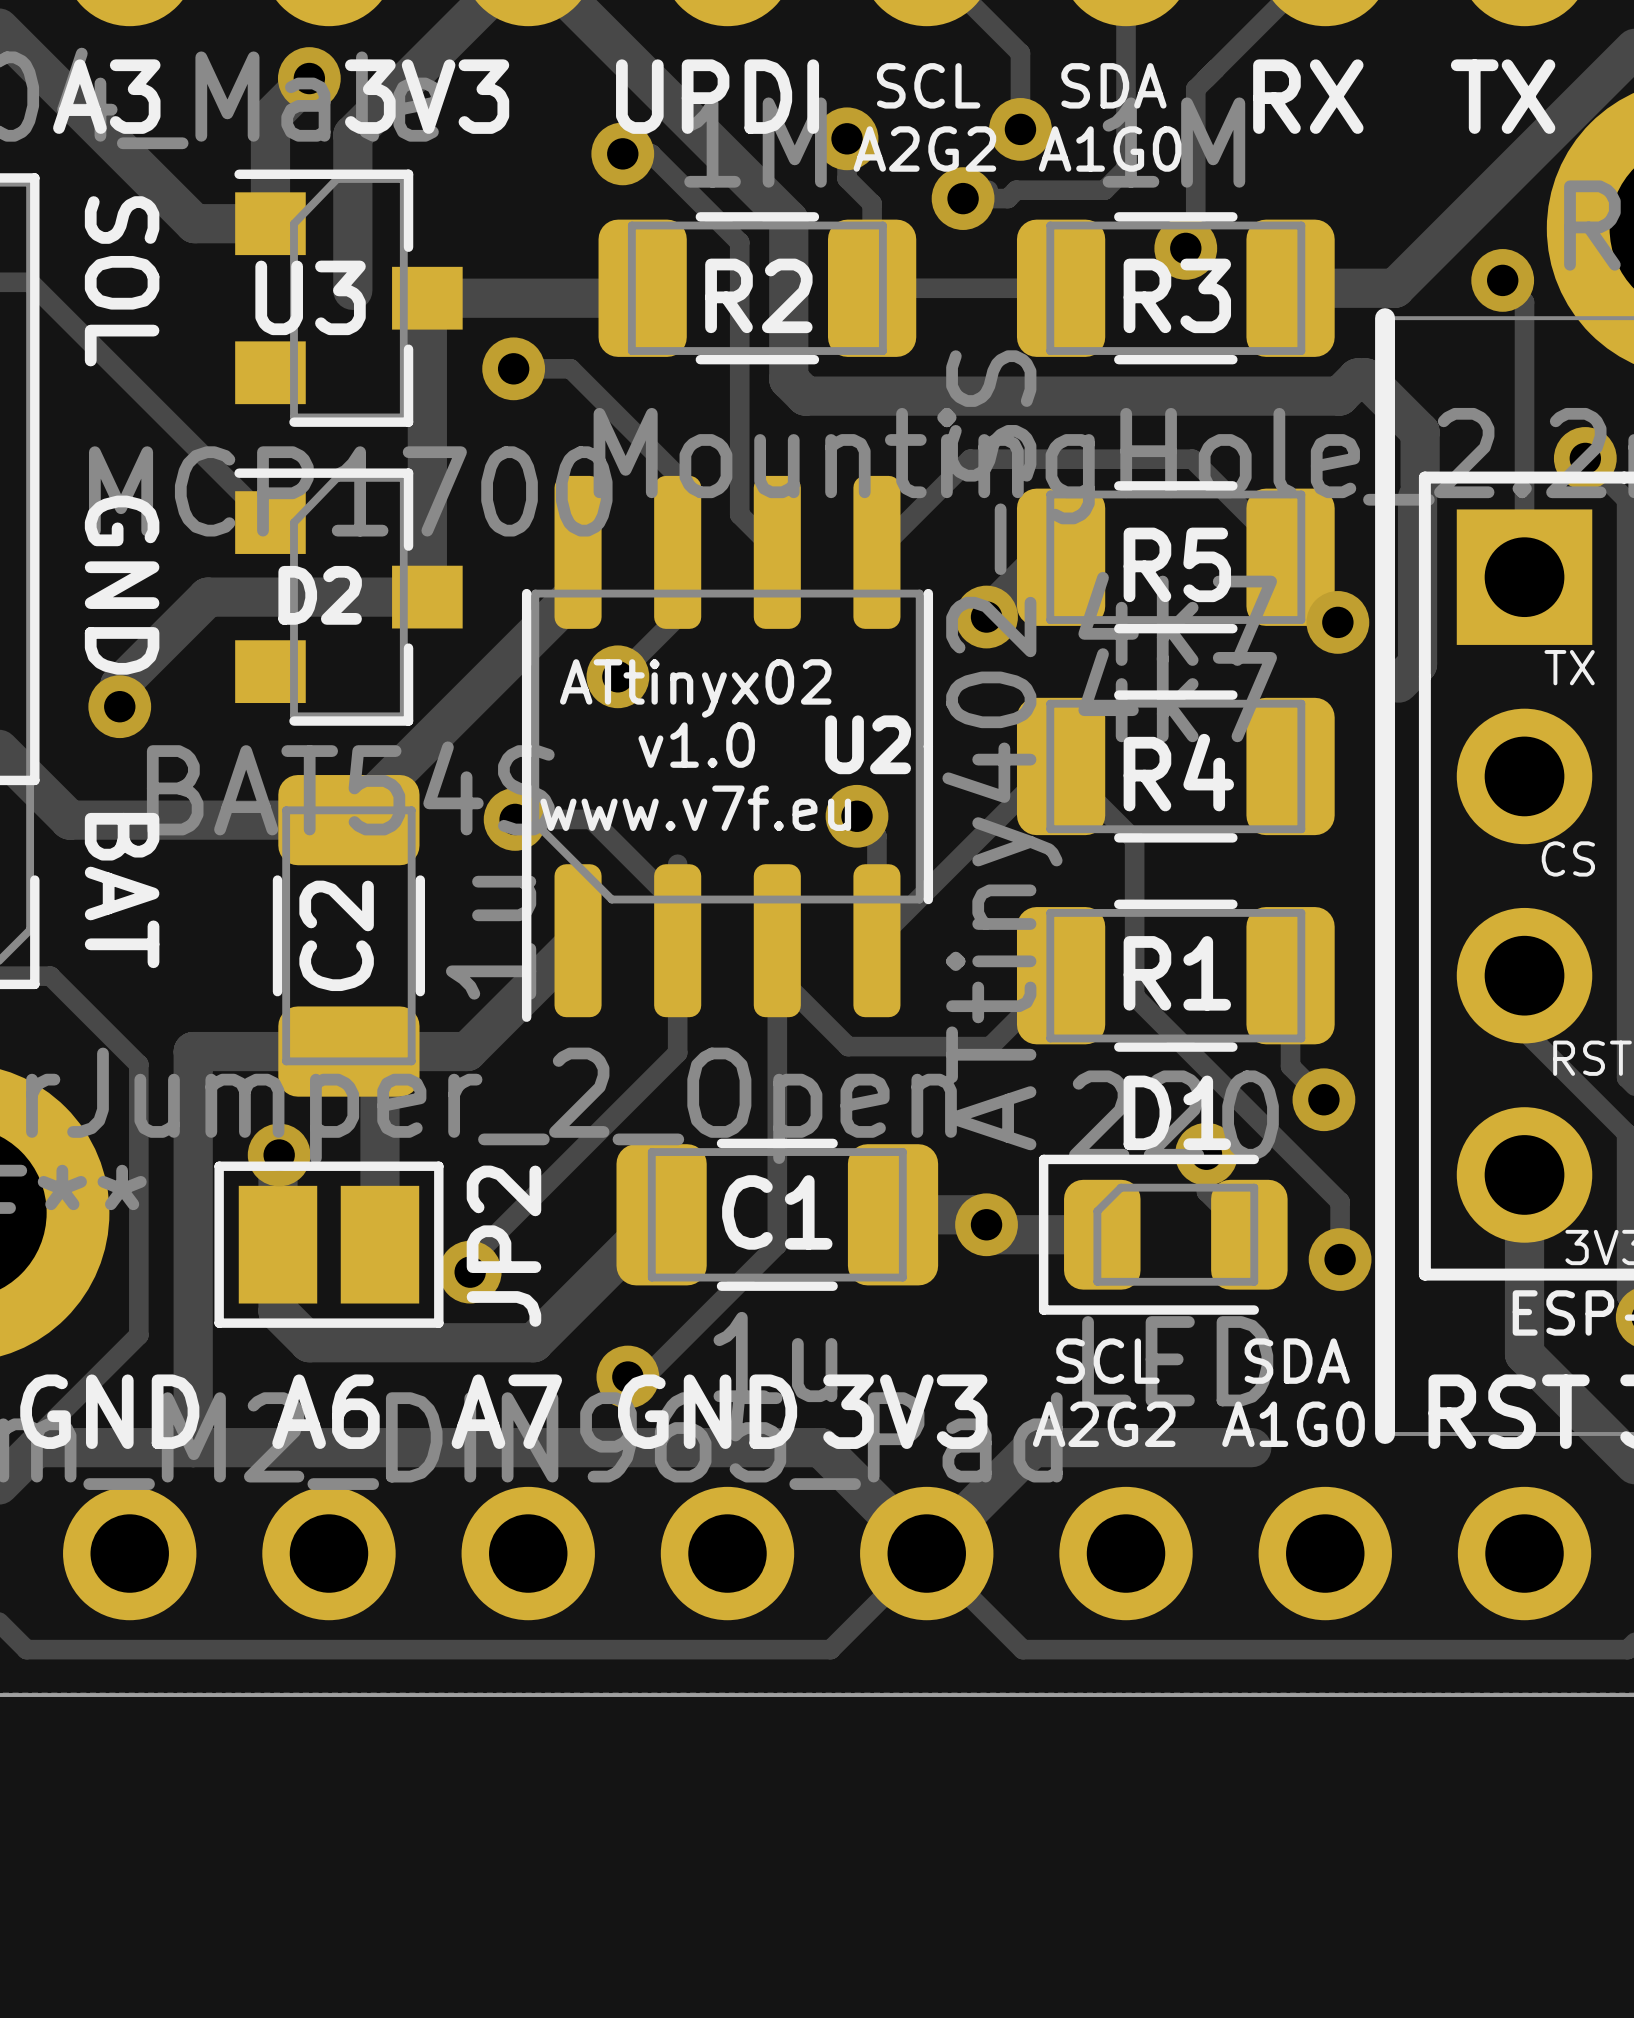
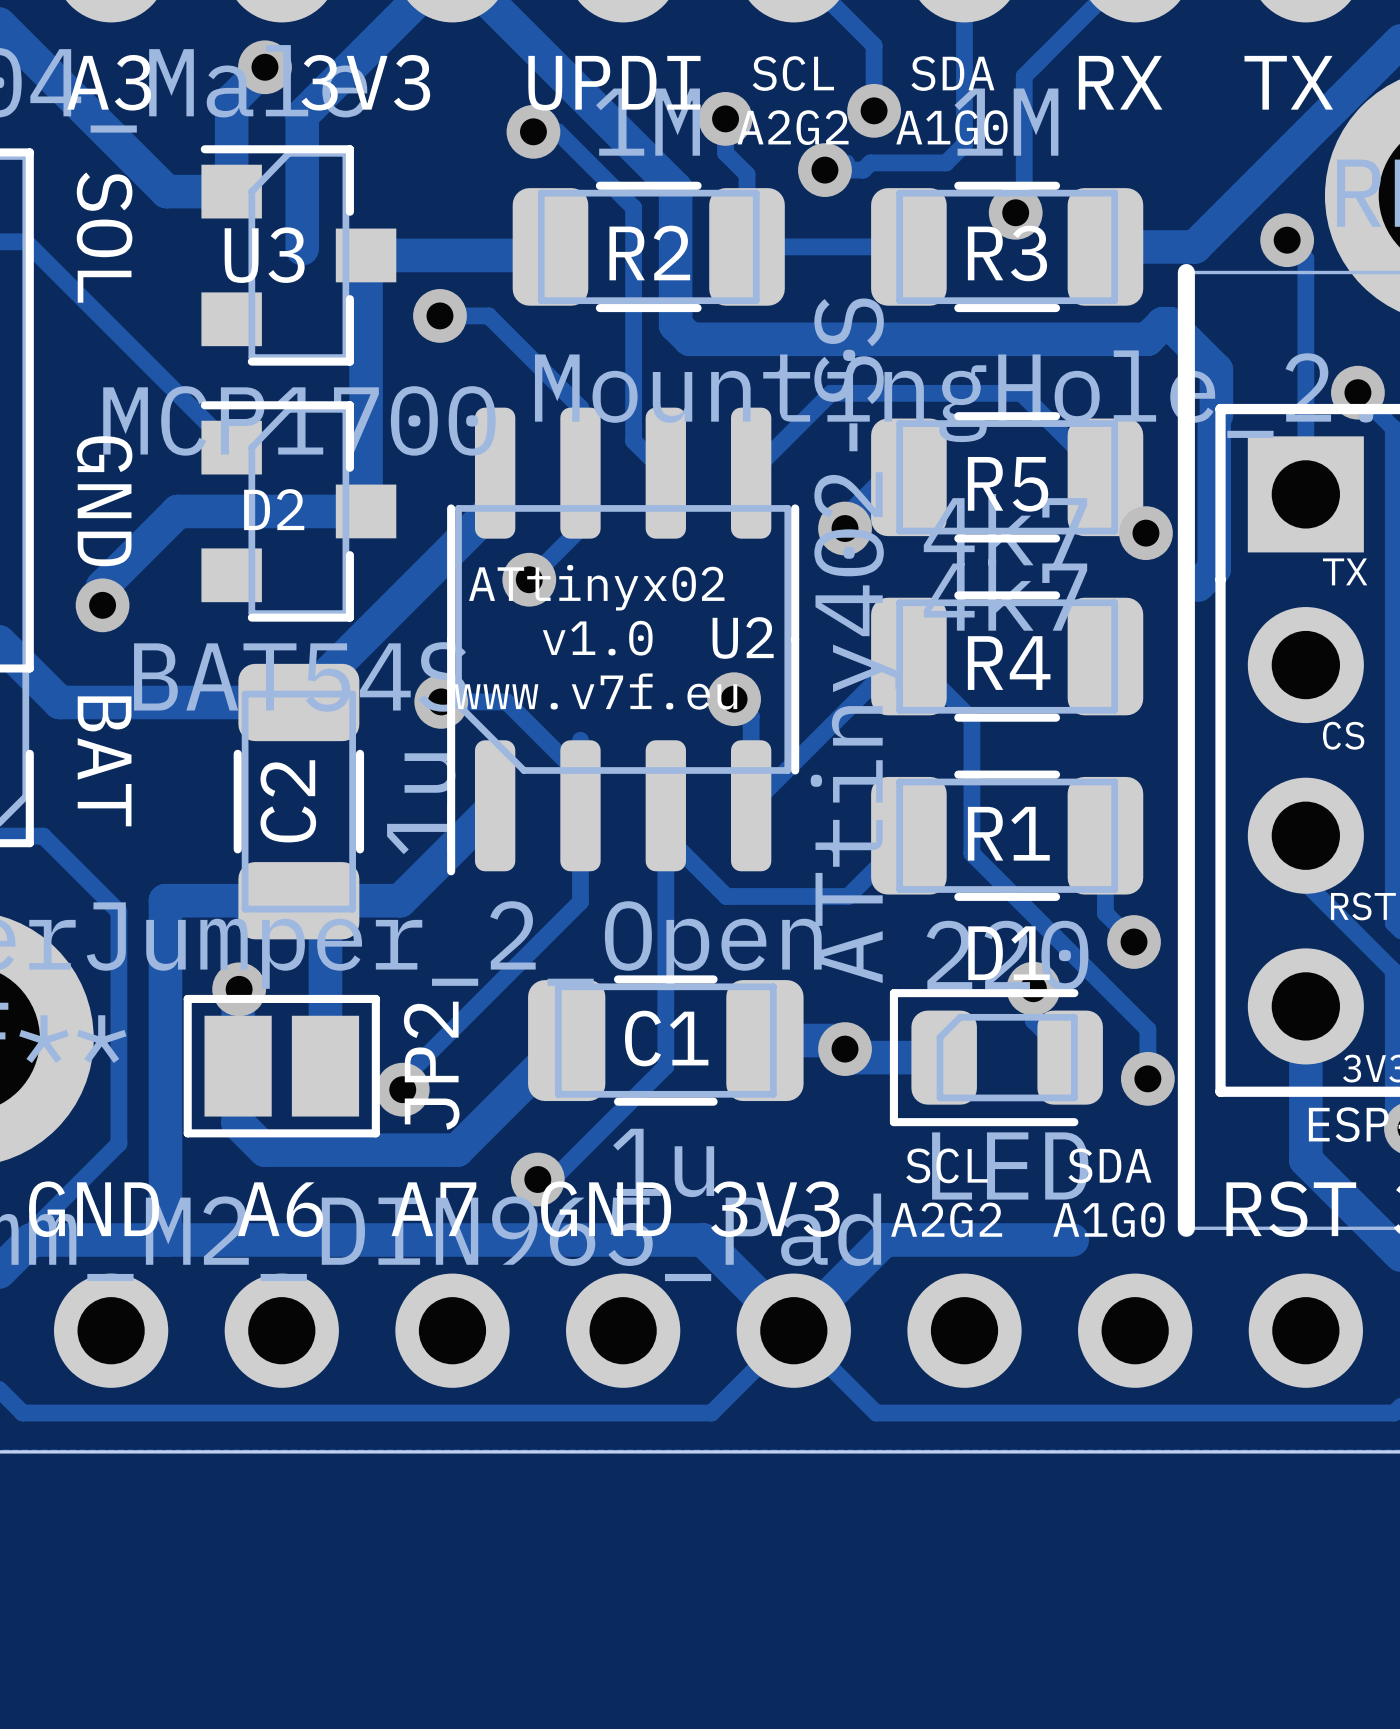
text position: A3 (106, 96) -> A3 (109, 82)

